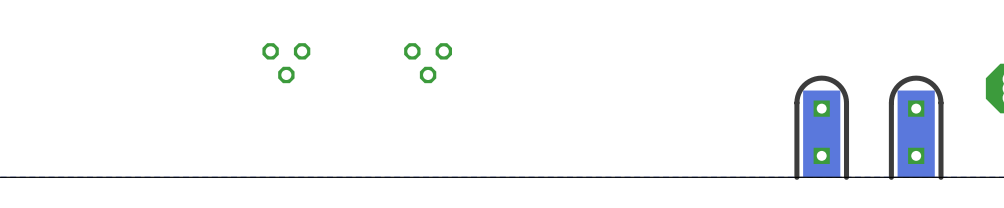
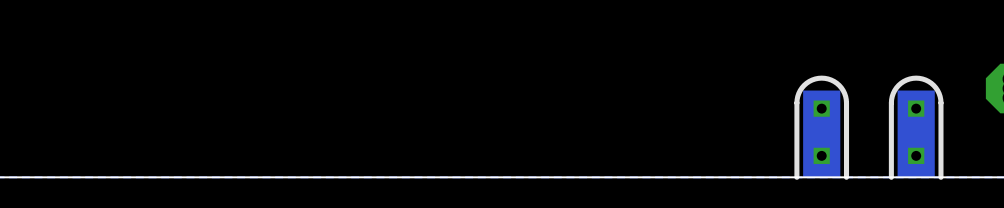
part: (286, 63) -> none
part: (428, 63) -> none

